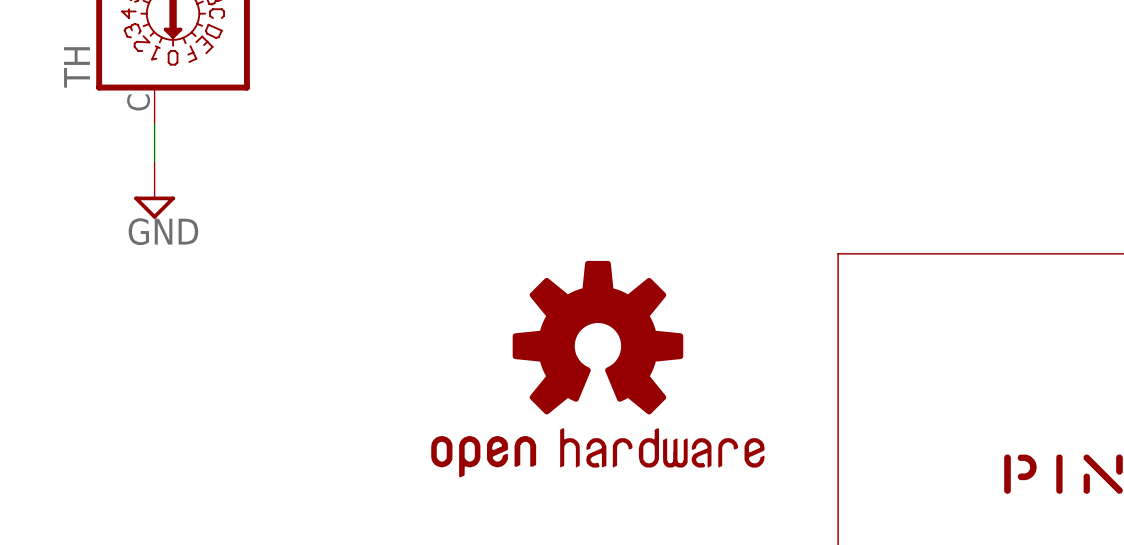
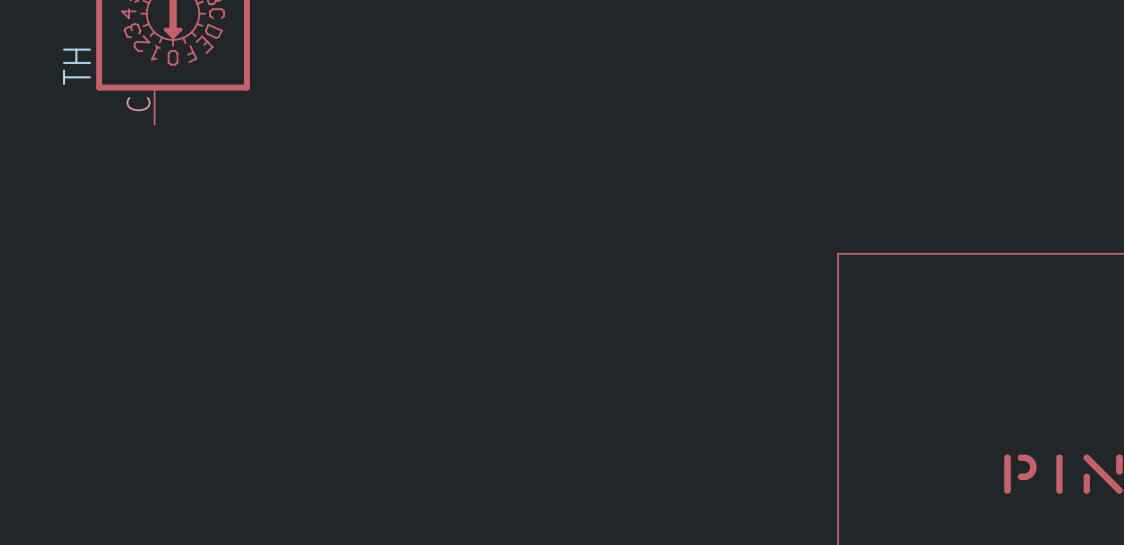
wire: (154, 124) (154, 161) -> none
power symbol: GND (154, 190) -> none
part: (597, 369) -> none

